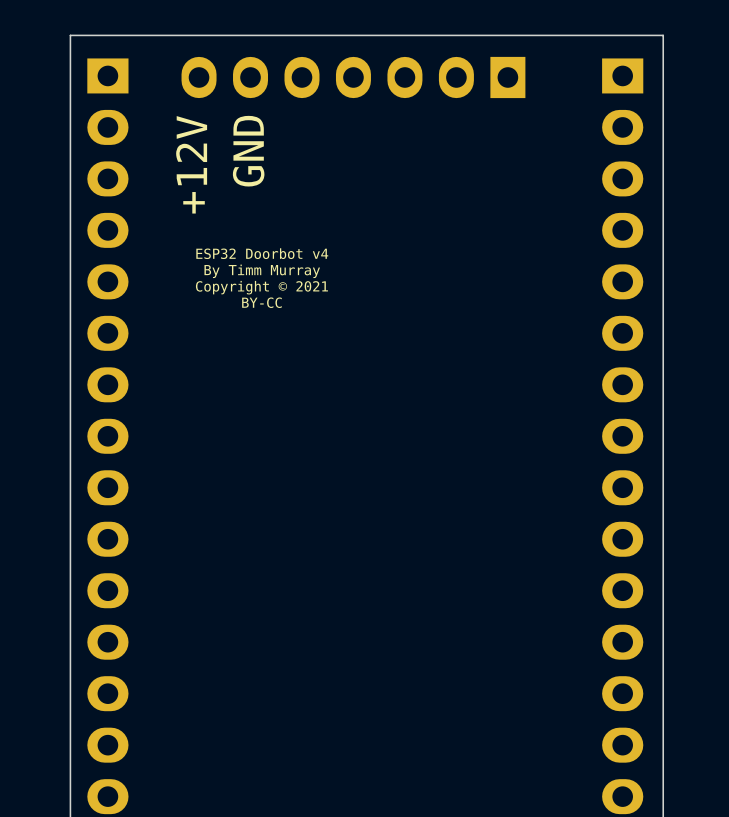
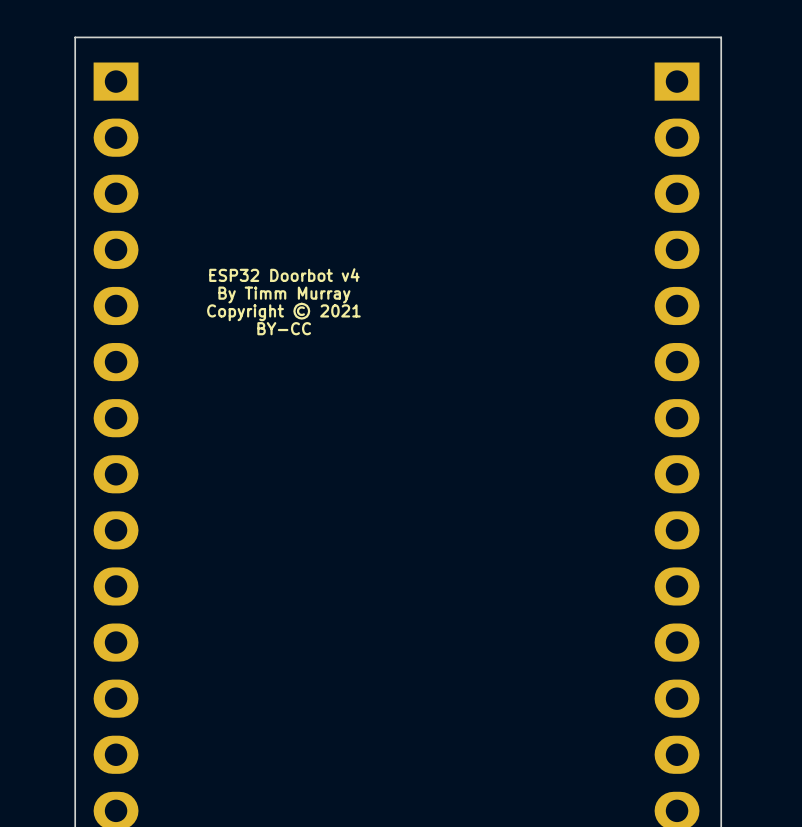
part: (353, 77) -> none
text: GND (248, 151) -> none
text: +12V (191, 164) -> none

